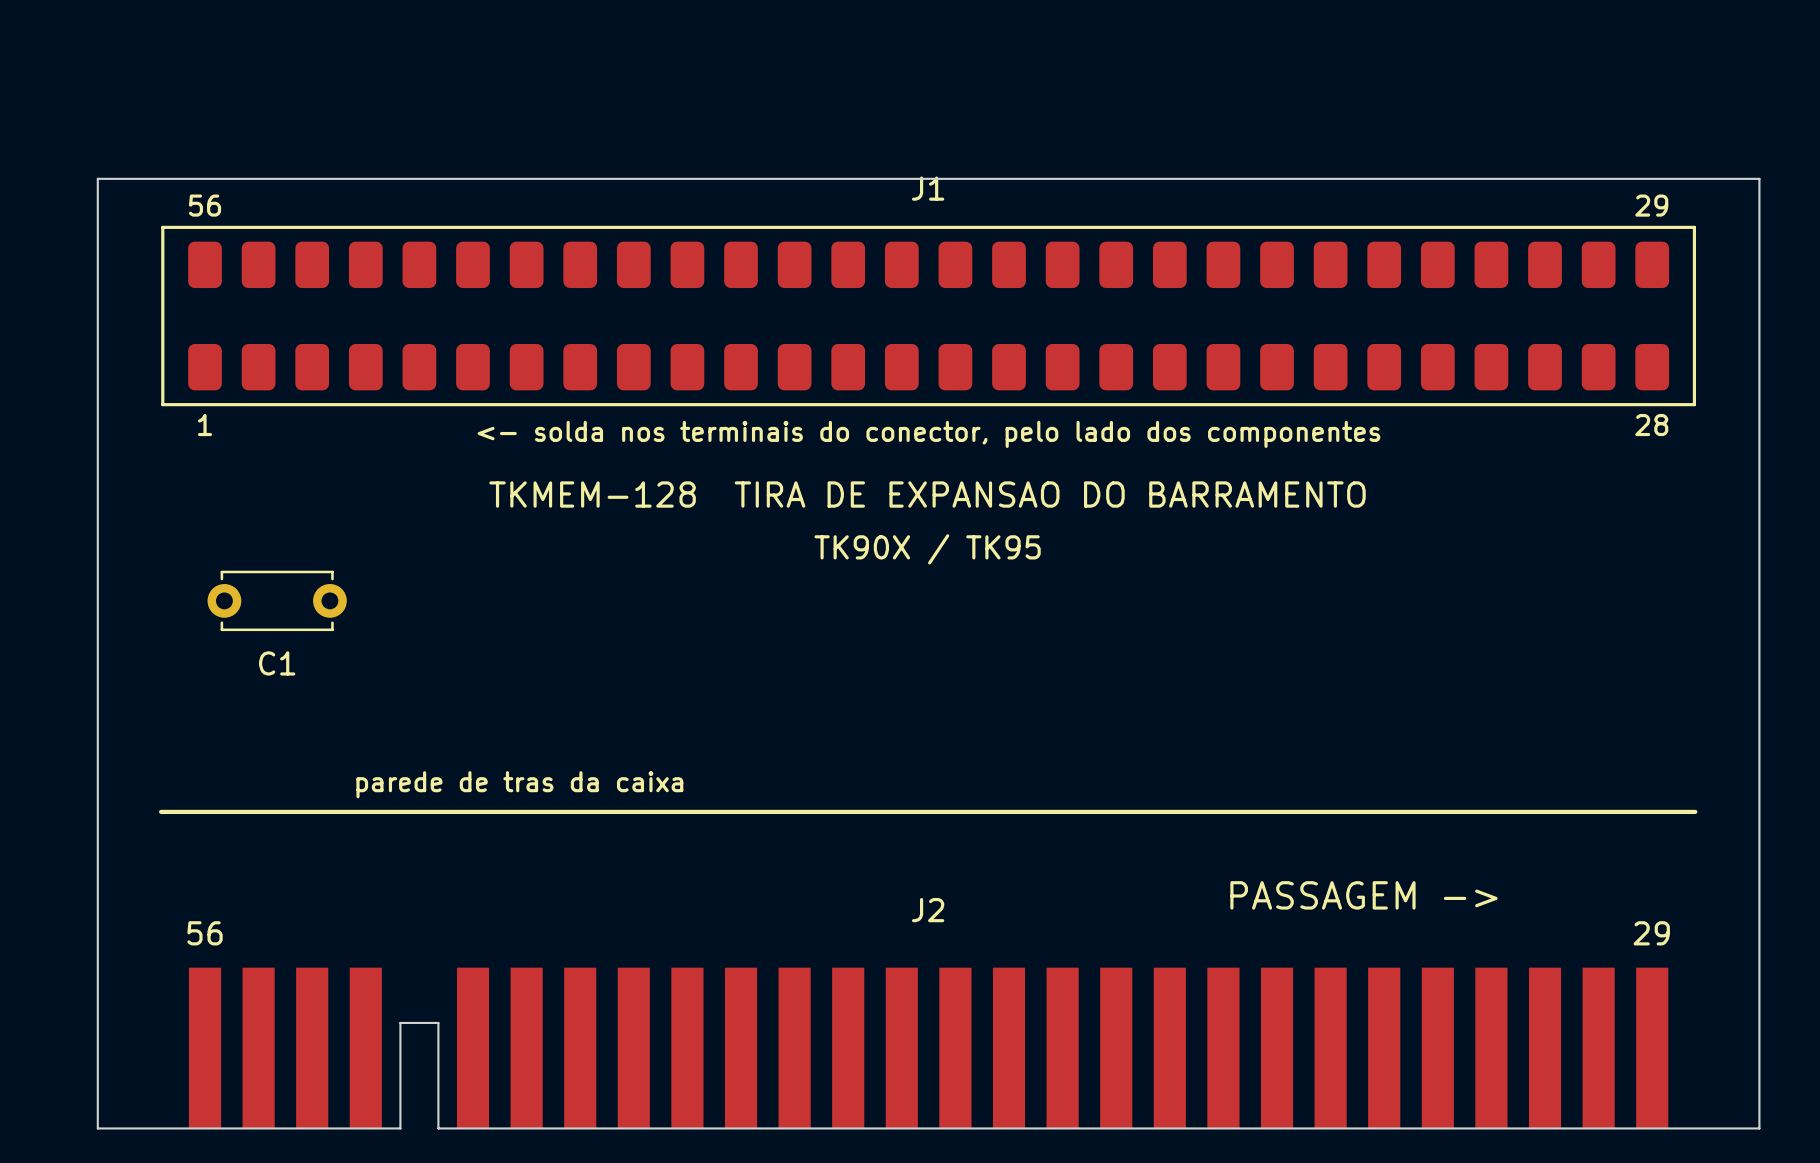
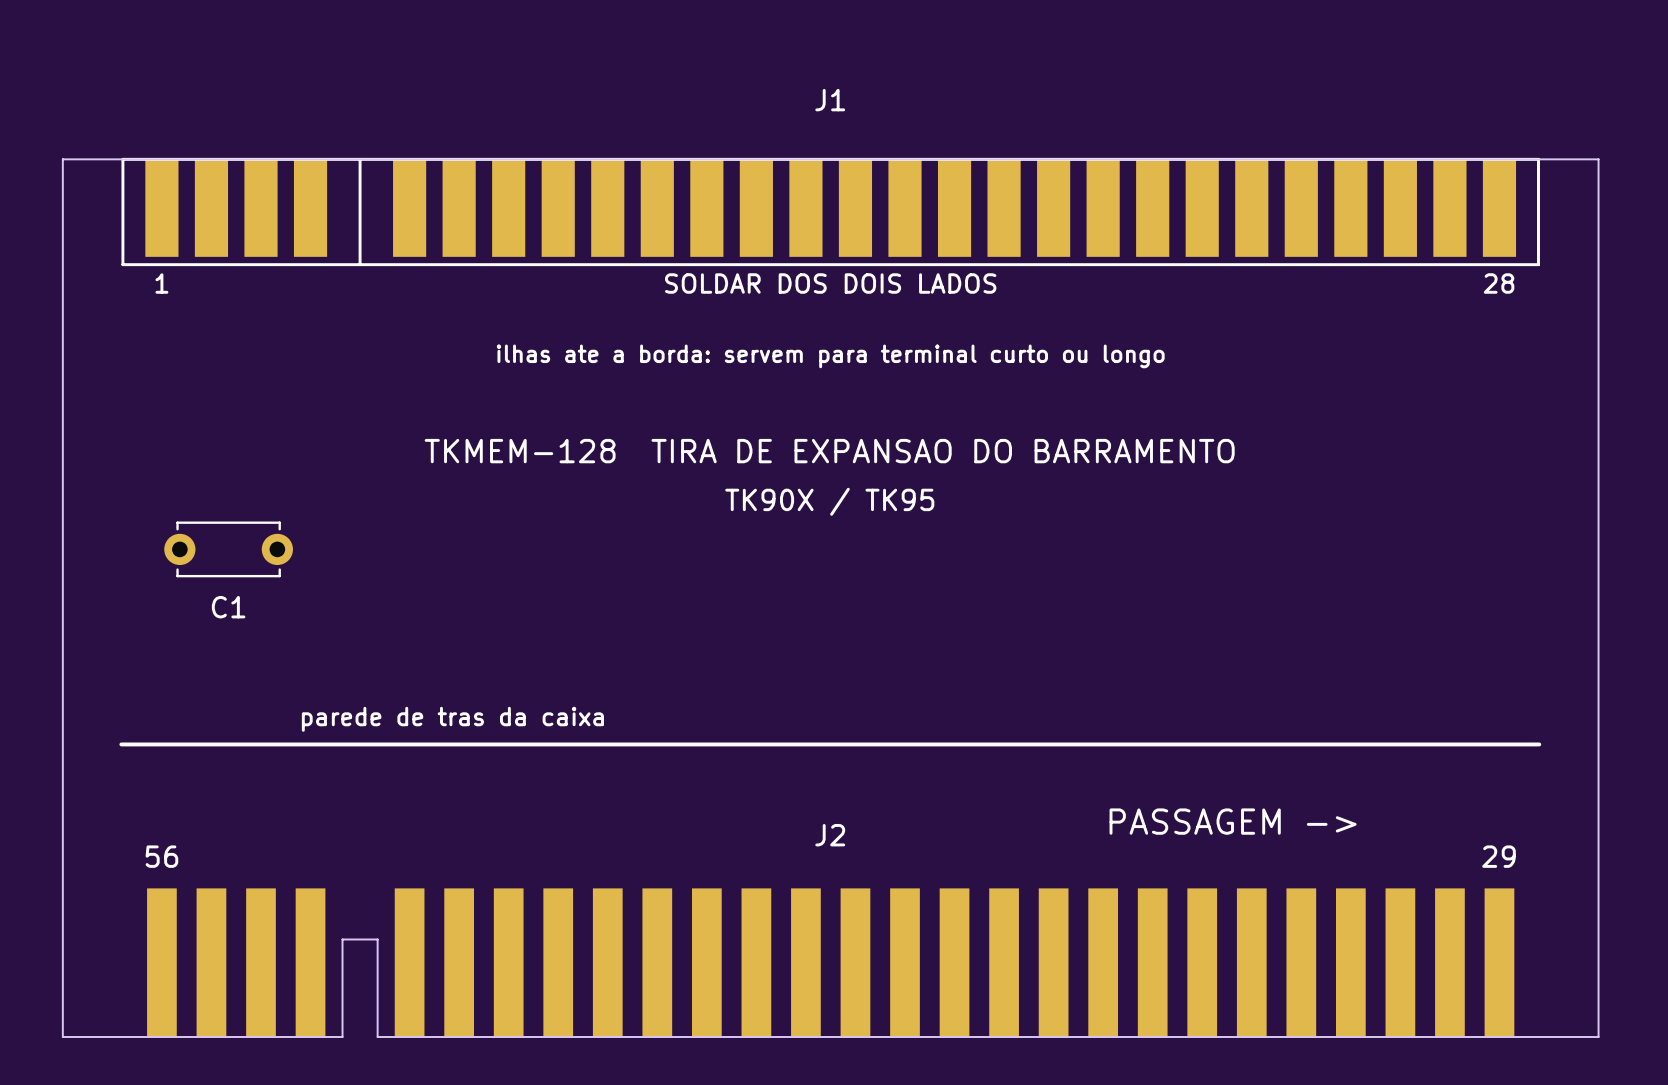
J1 footprint: [161, 225, 1697, 407] -> [121, 157, 1540, 267]
text: none -> ilhas ate a borda: servem para terminal curto ou longo (830, 356)
text: <- solda nos terminais do conector, pelo lado dos componentes (929, 434) -> none

